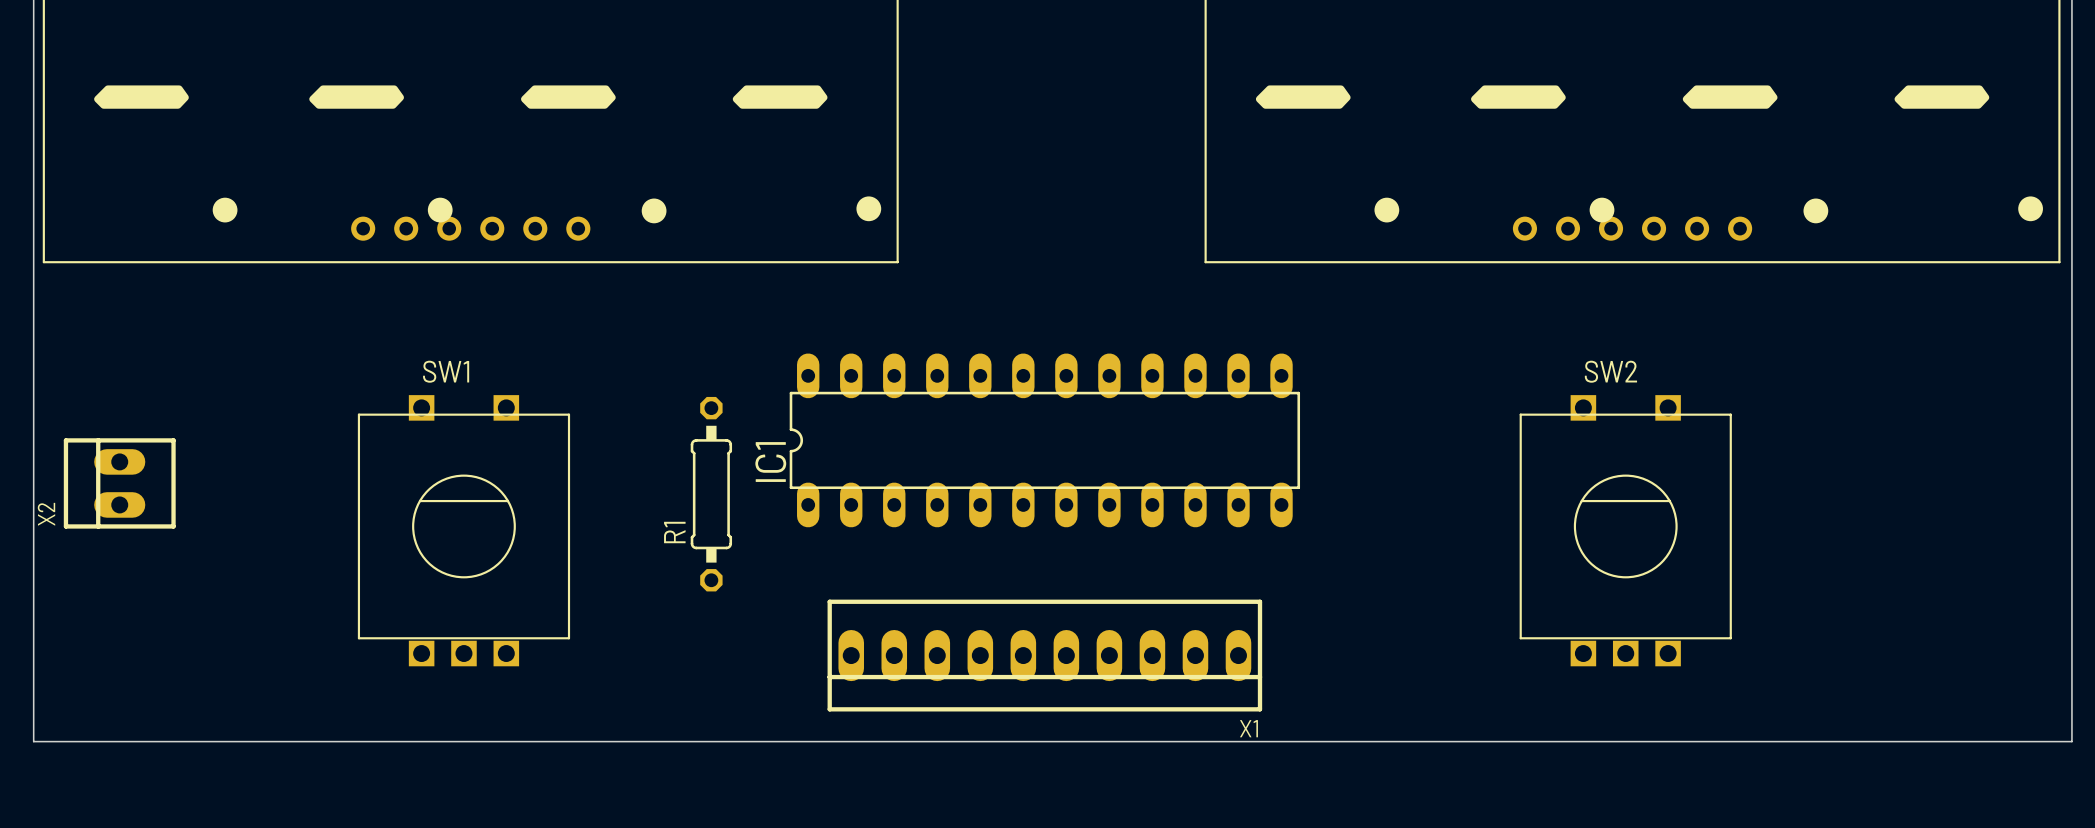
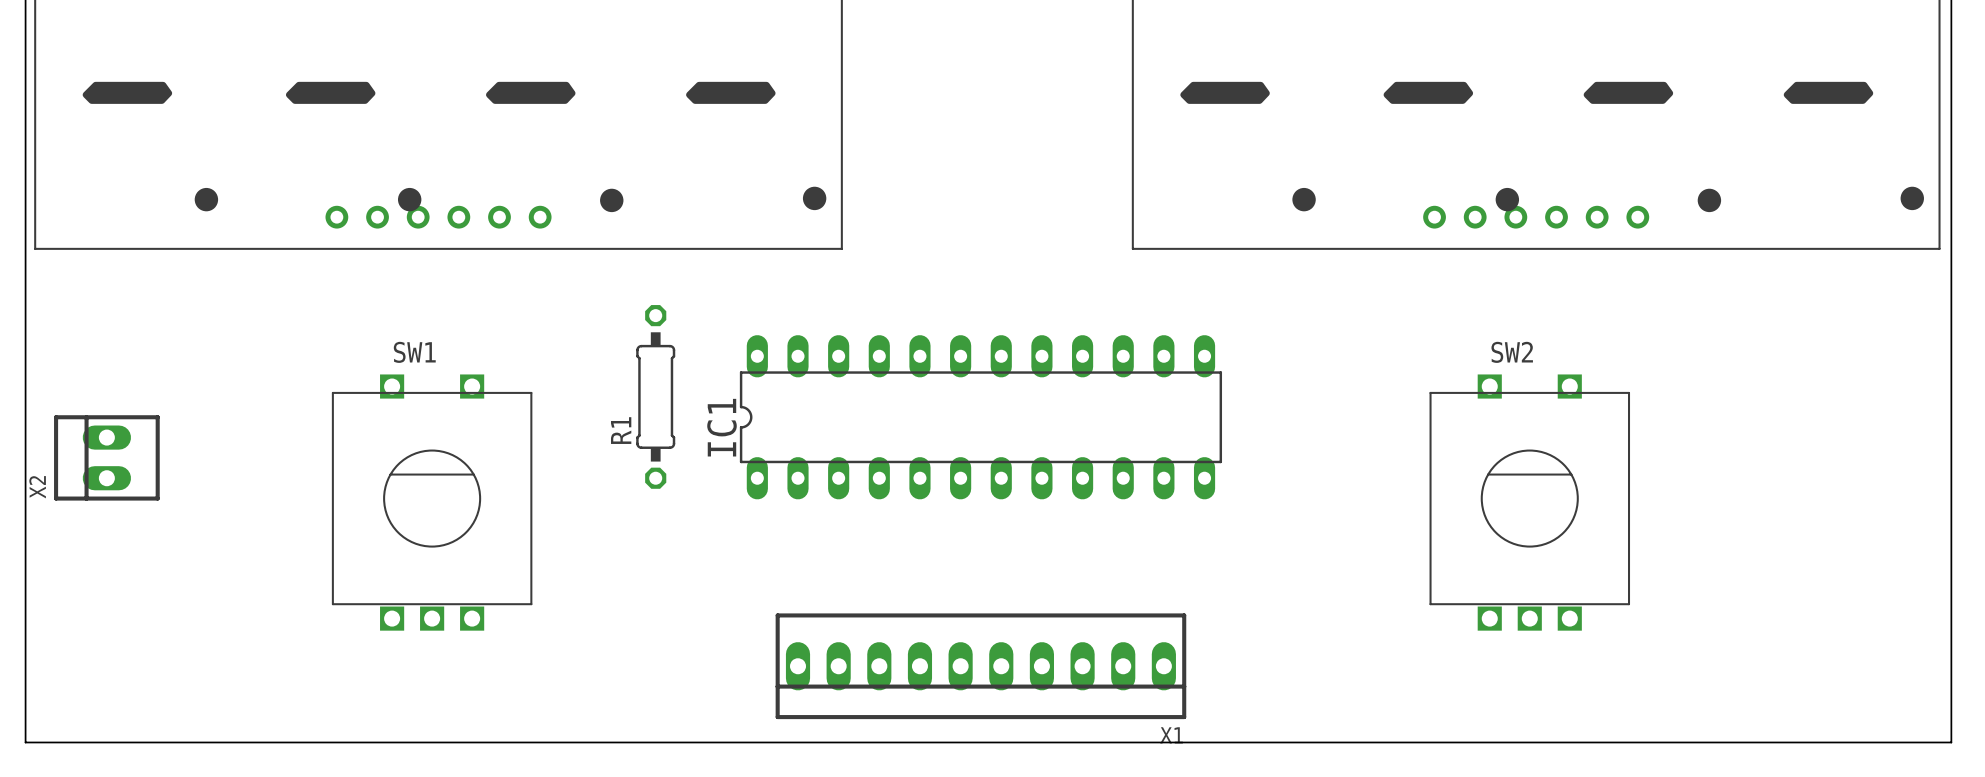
R1 position: (711, 494) -> (655, 396)
X1 position: (1044, 655) -> (980, 666)
board edge: (33, 741) (2071, 741) -> (25, 701) (25, 742) (1951, 742) (1951, 701)

